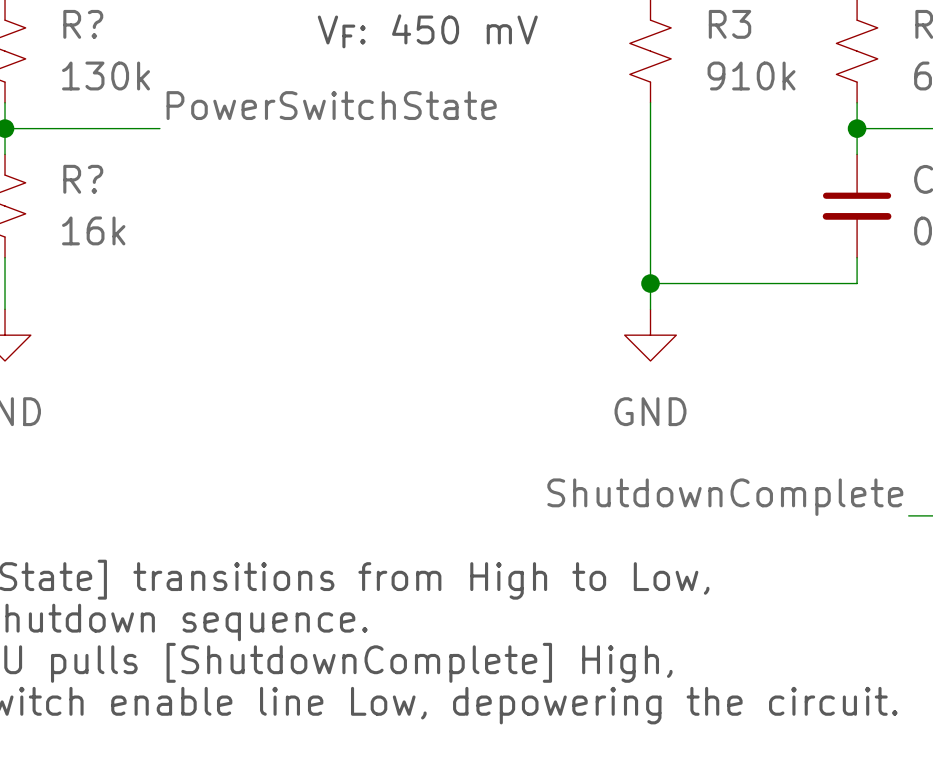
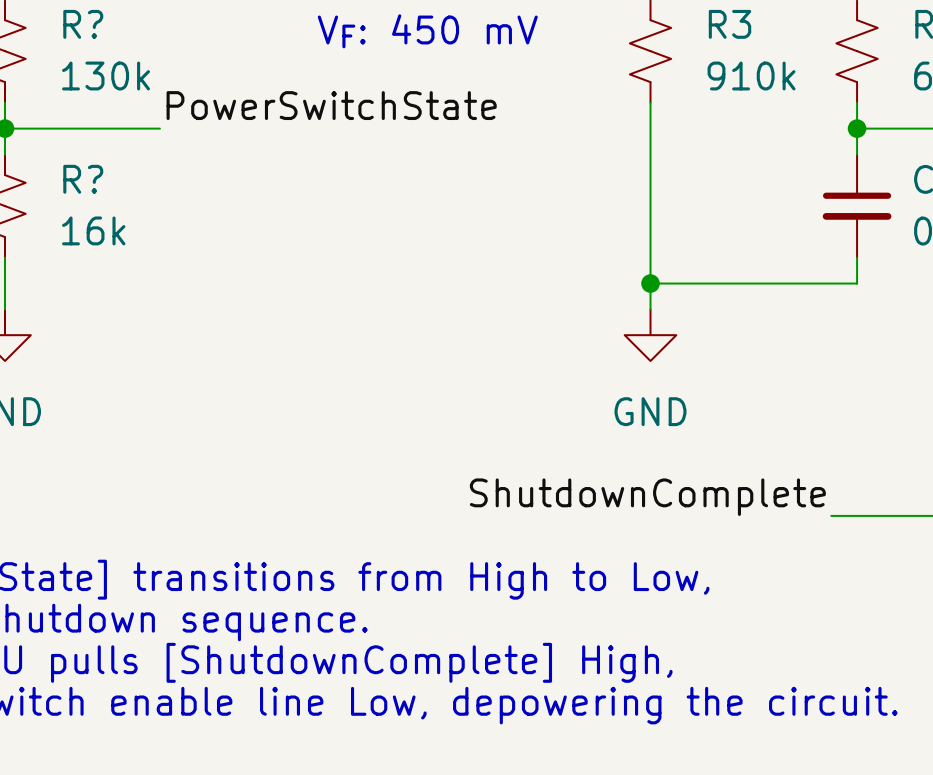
label position: ShutdownComplete (725, 497) -> ShutdownComplete (647, 497)
wire: none -> (831, 515) (908, 515)

